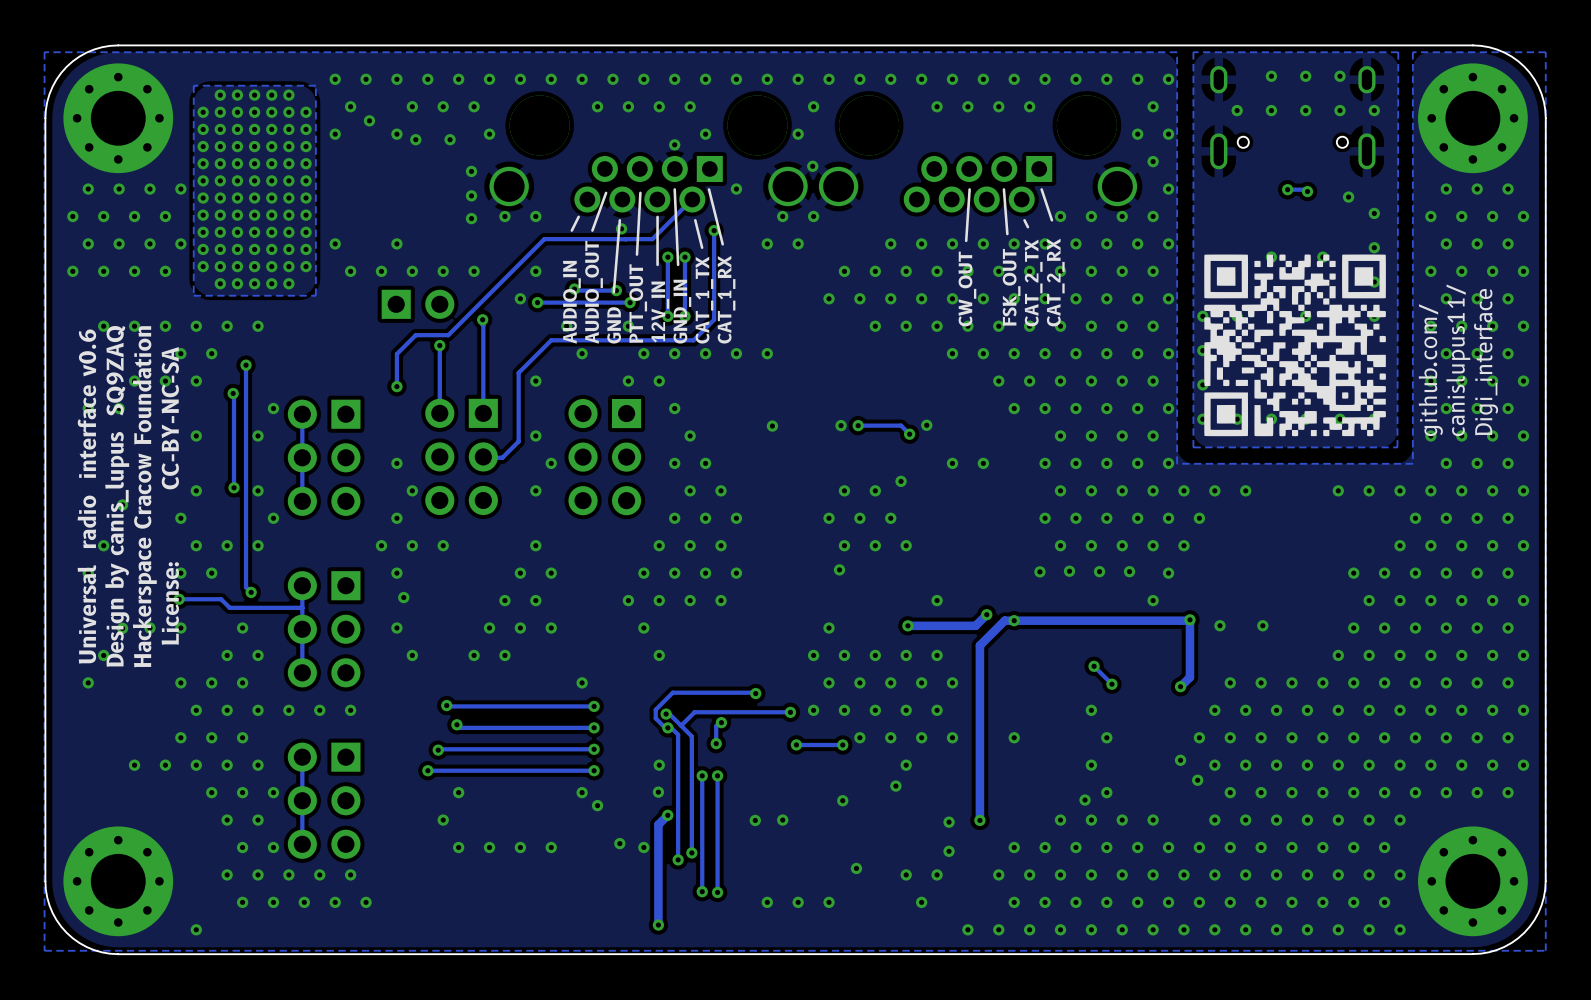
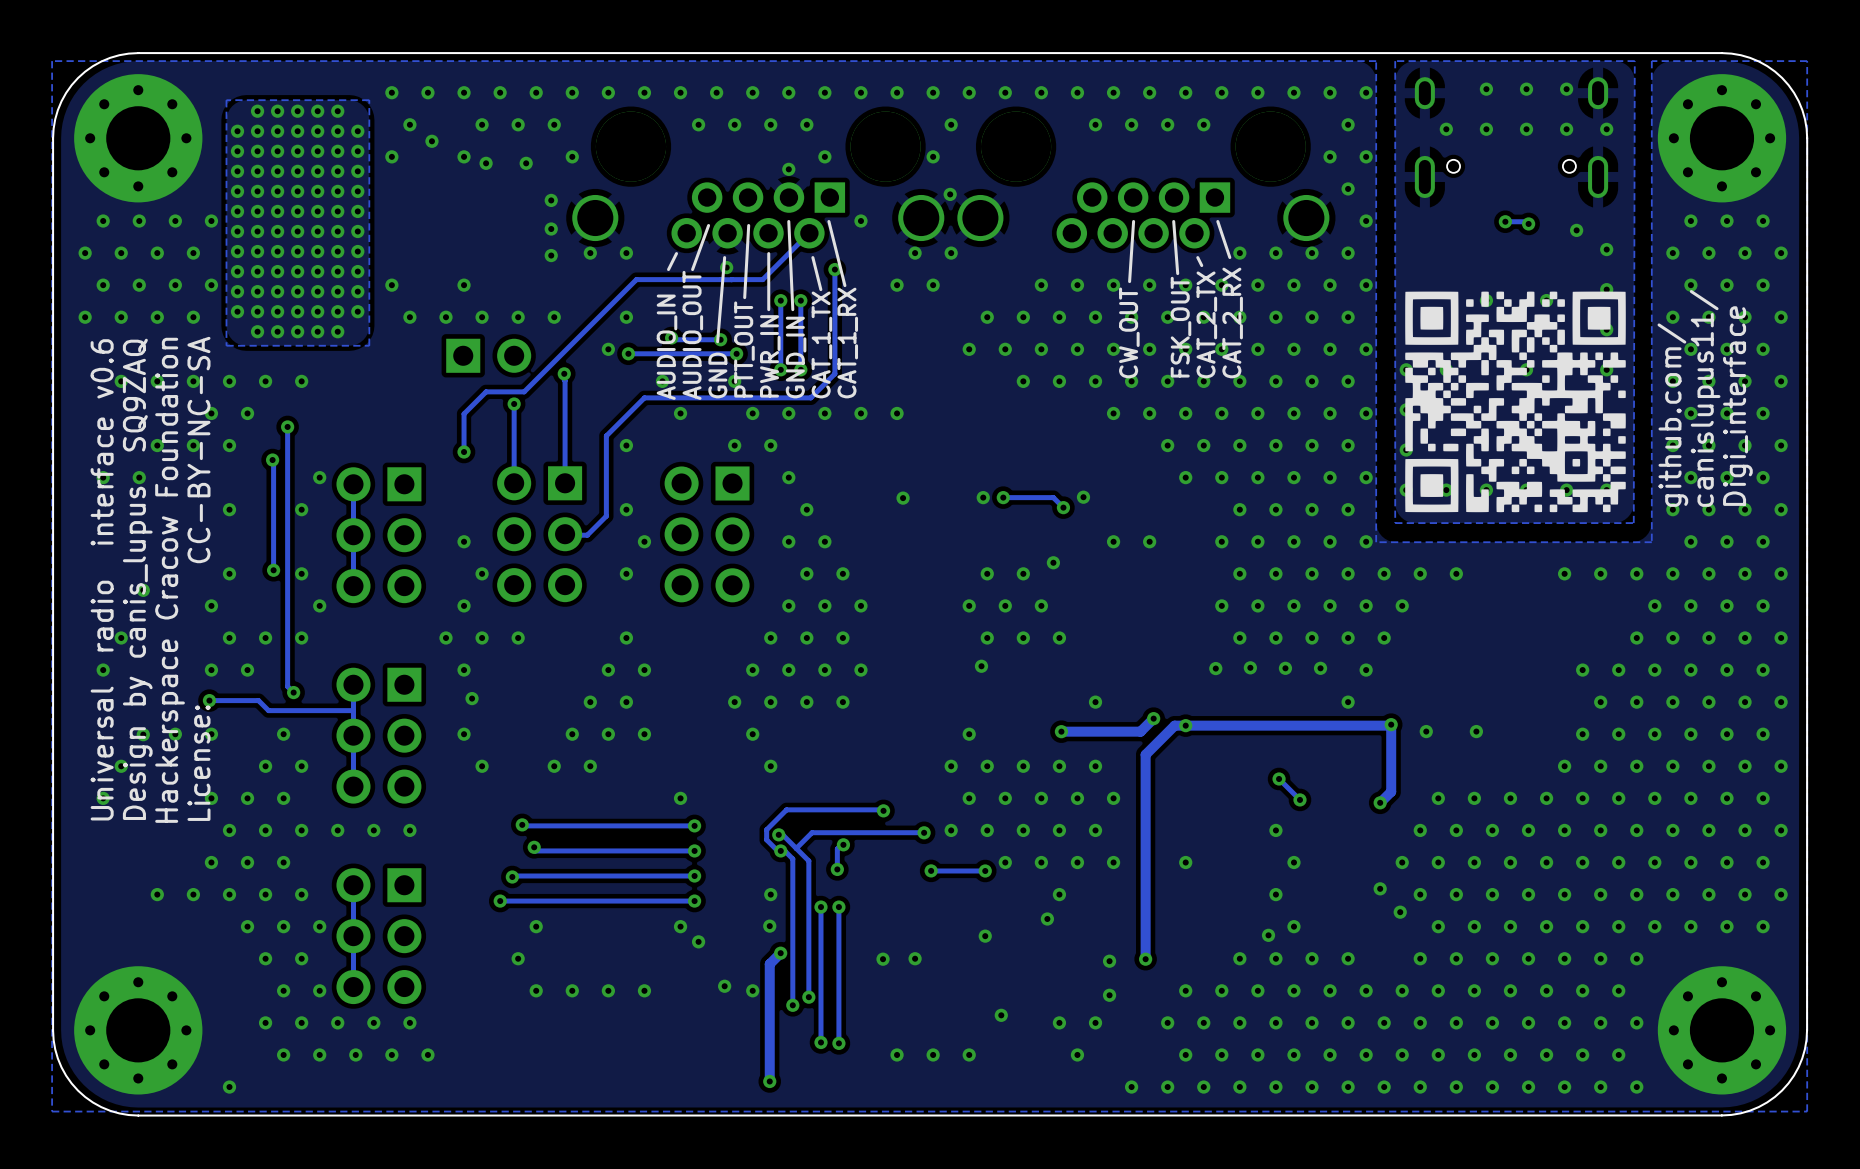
drawing shape: [1204, 254, 1386, 437] -> [1405, 291, 1626, 513]
text: 12V_IN (660, 312) -> PWR_IN (770, 356)

